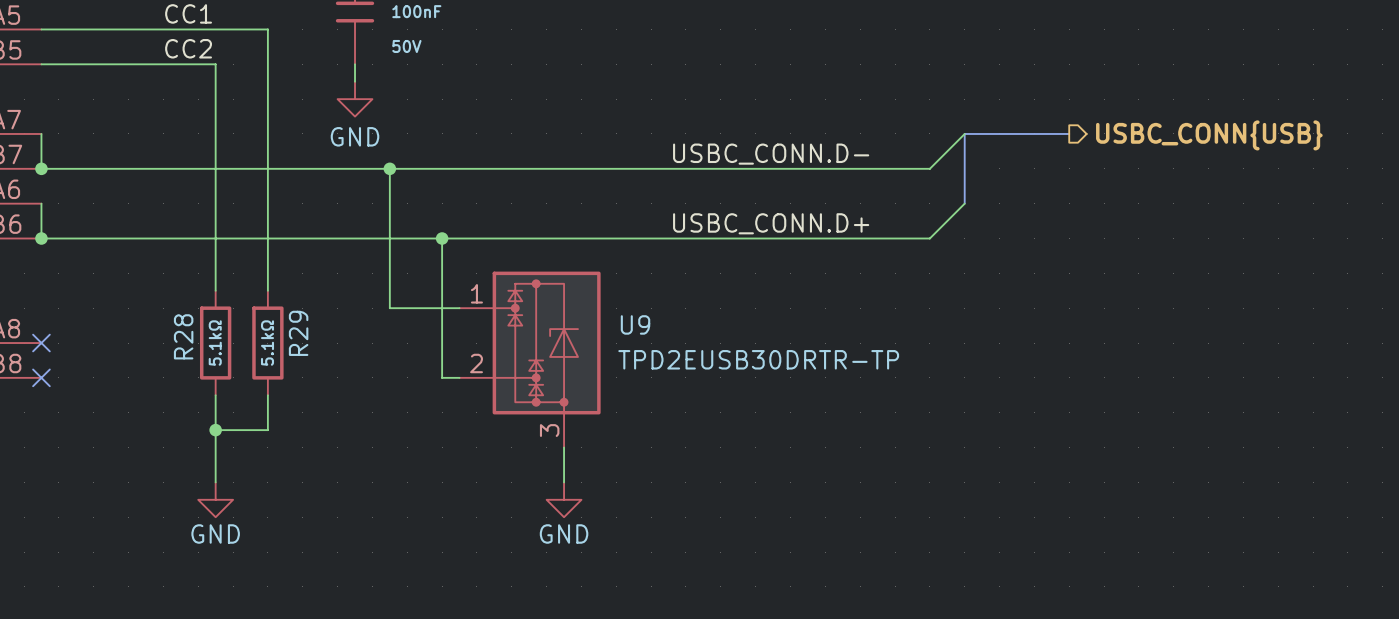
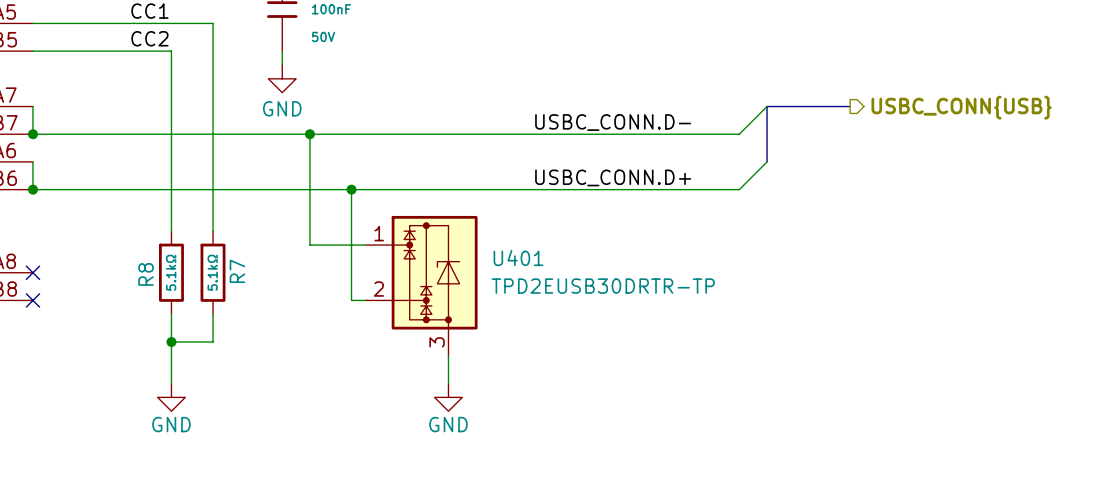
U9 name: U9 (635, 324) -> U401 (518, 258)
R29 name: R29 (298, 333) -> R7 (237, 271)
R28 name: R28 (183, 336) -> R8 (146, 274)

